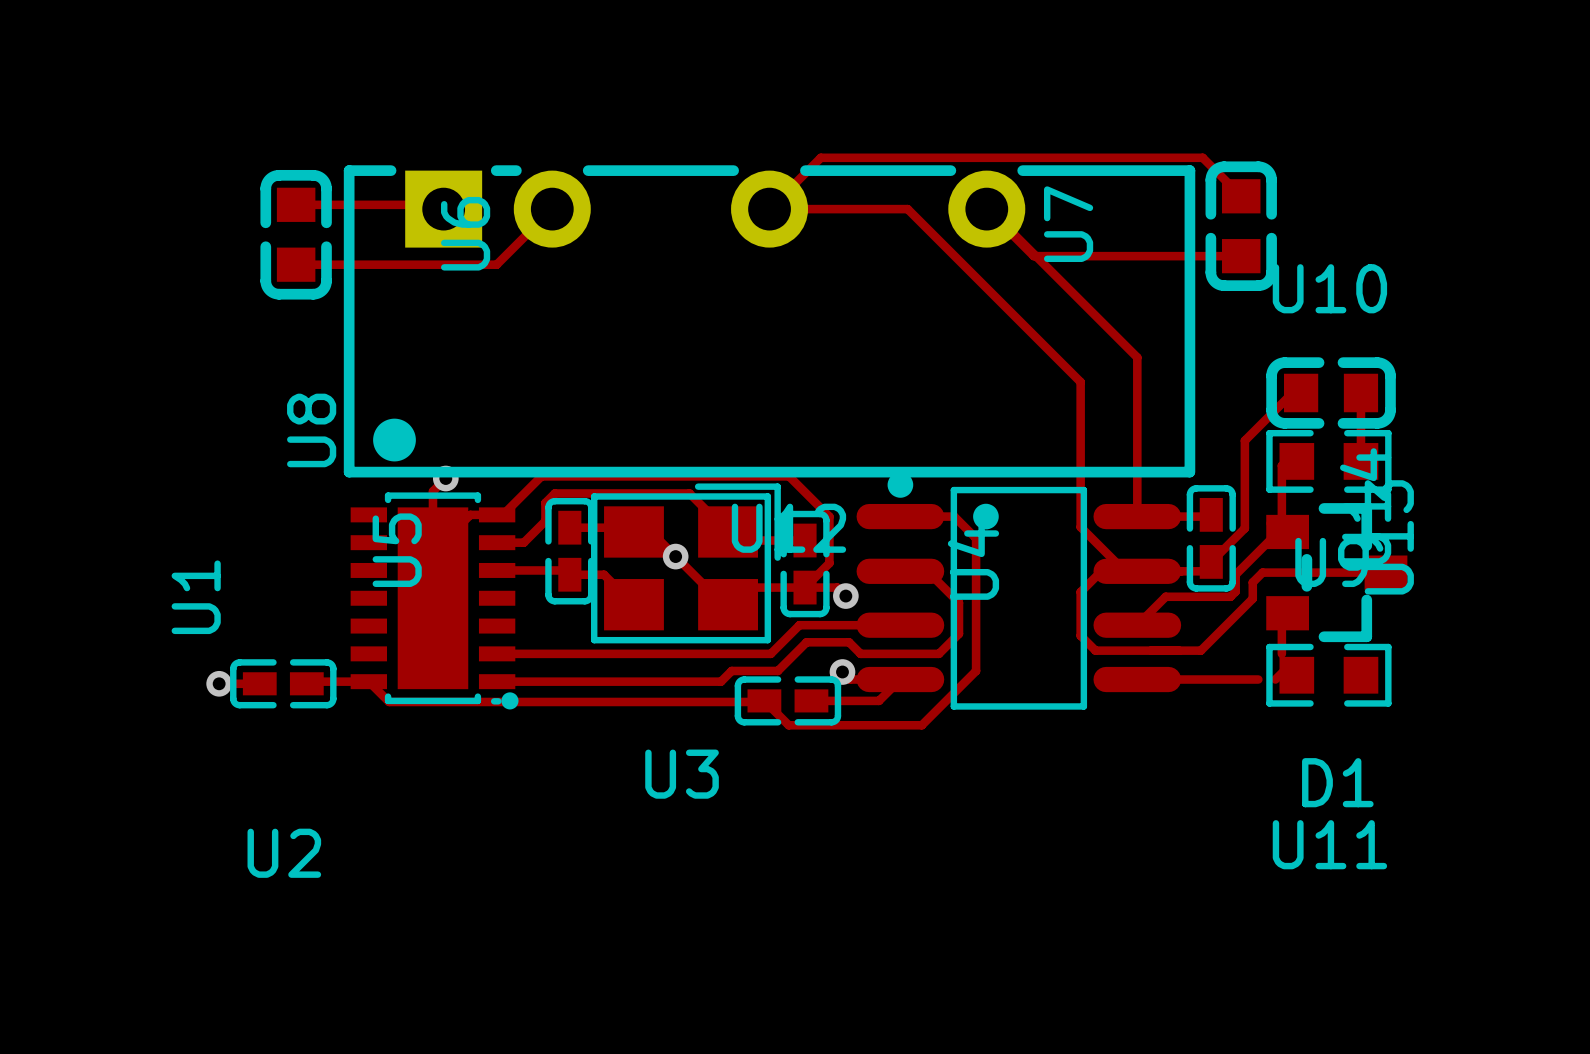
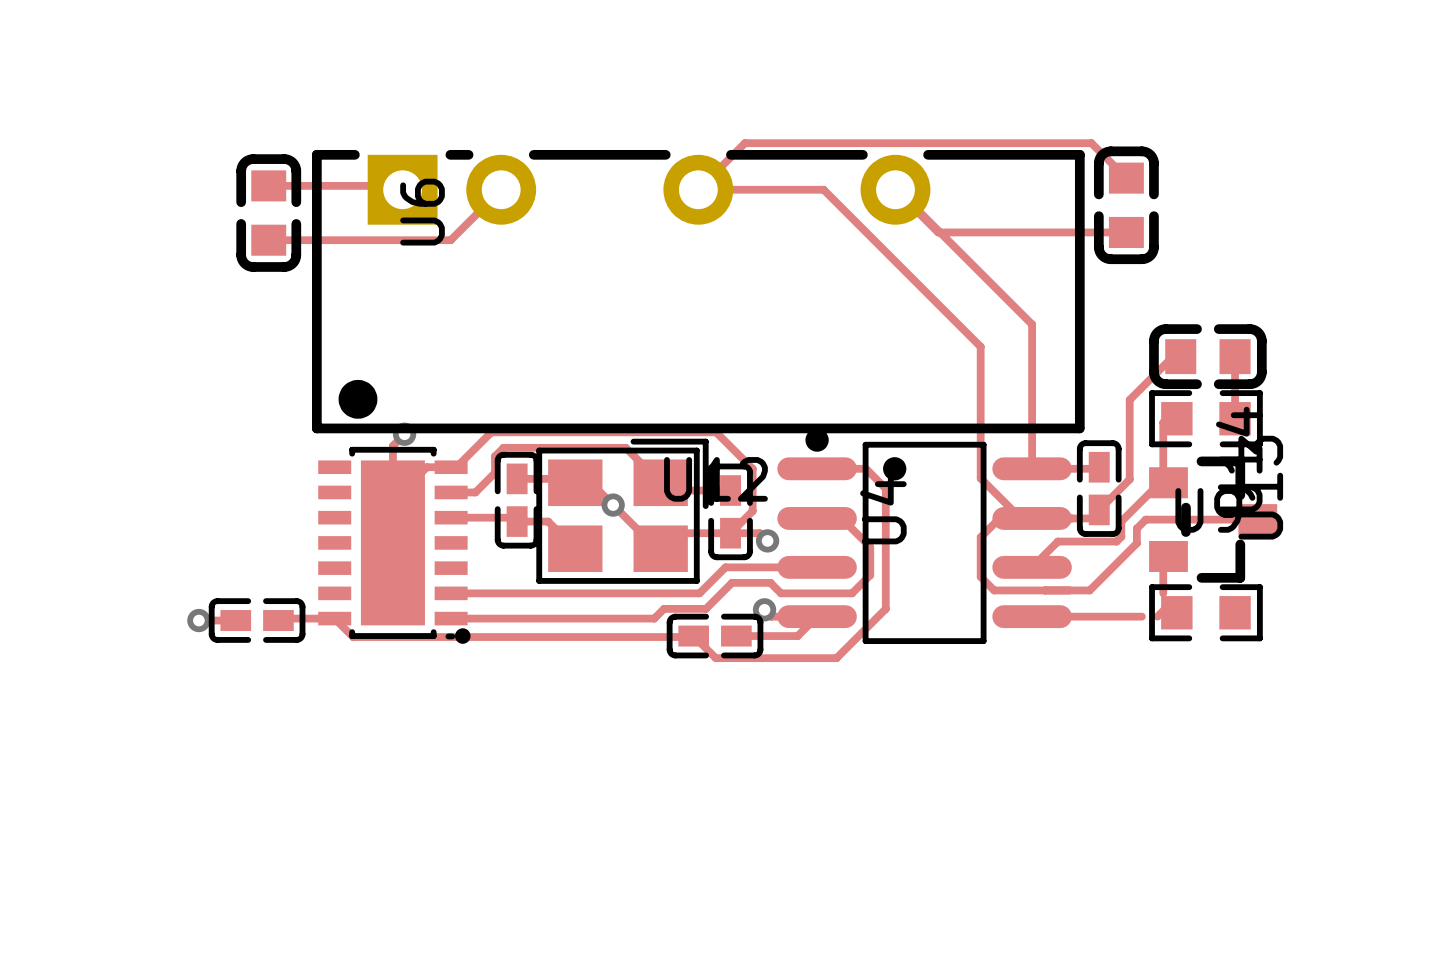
U7 name: U7 (1068, 224) -> none
U10 name: U10 (1329, 288) -> none
U8 name: U8 (311, 430) -> none
U5 name: U5 (397, 550) -> none
U1 name: U1 (196, 597) -> none
U3 name: U3 (682, 774) -> none
D1 name: D1 (1337, 782) -> none
U11 name: U11 (1329, 844) -> none
U2 name: U2 (284, 853) -> none

